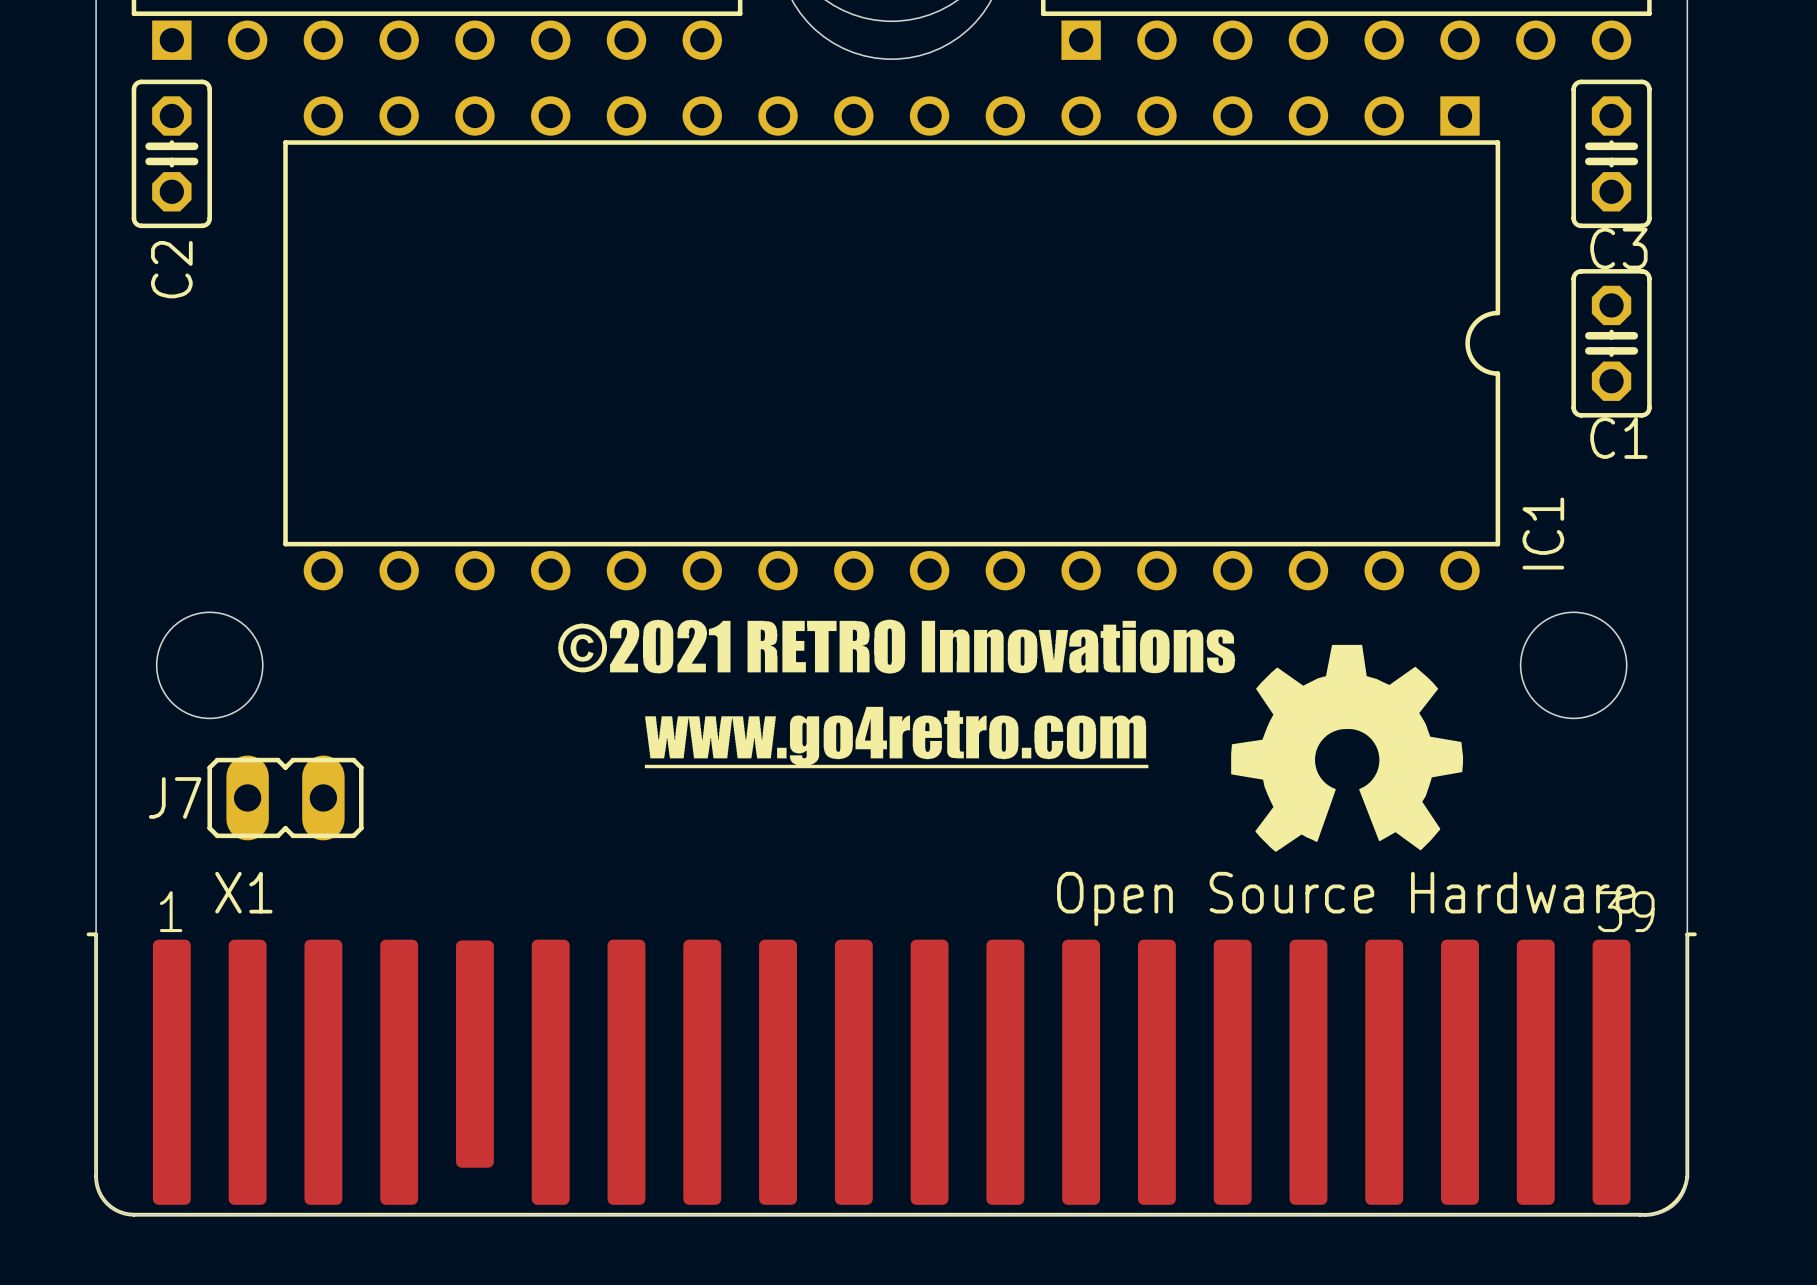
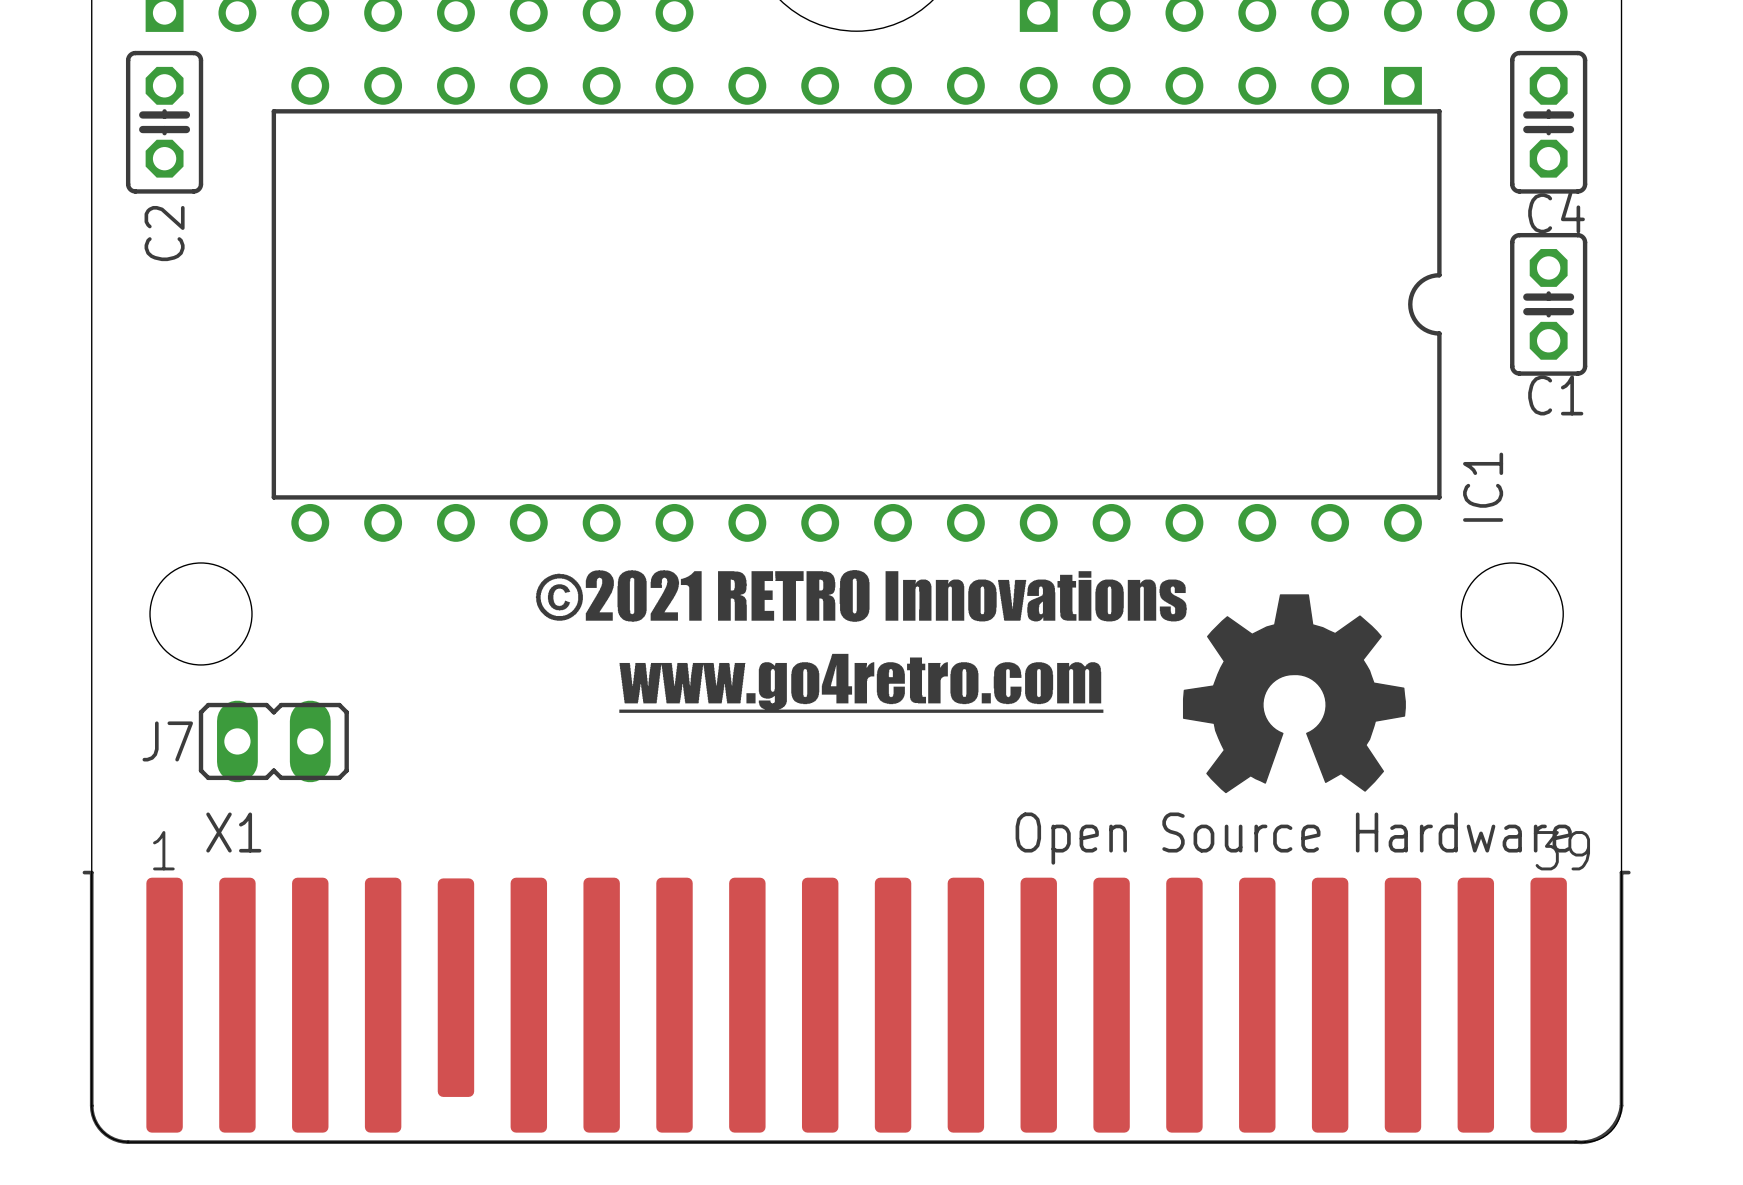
C3 name: C3 (1618, 248) -> C4 (1556, 212)

